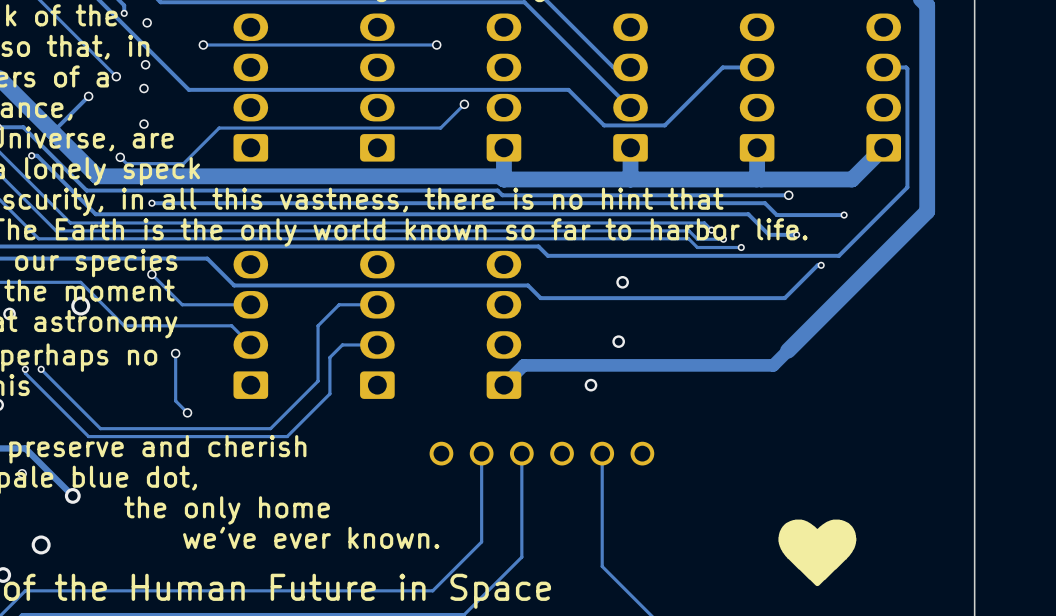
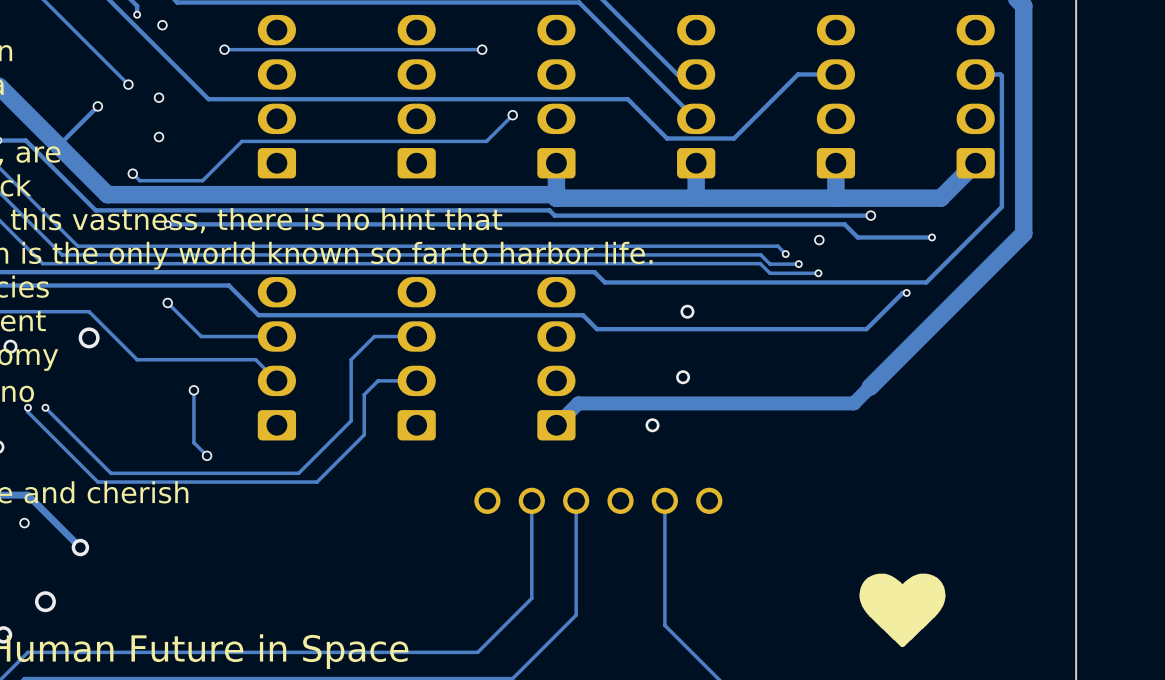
via: (145, 64) -> none
track: (31, 155) (37, 155) (95, 214) (748, 214) (768, 234) (796, 234) -> none
via: (31, 155) -> none
via: none -> (819, 240)
via: (796, 234) -> none

